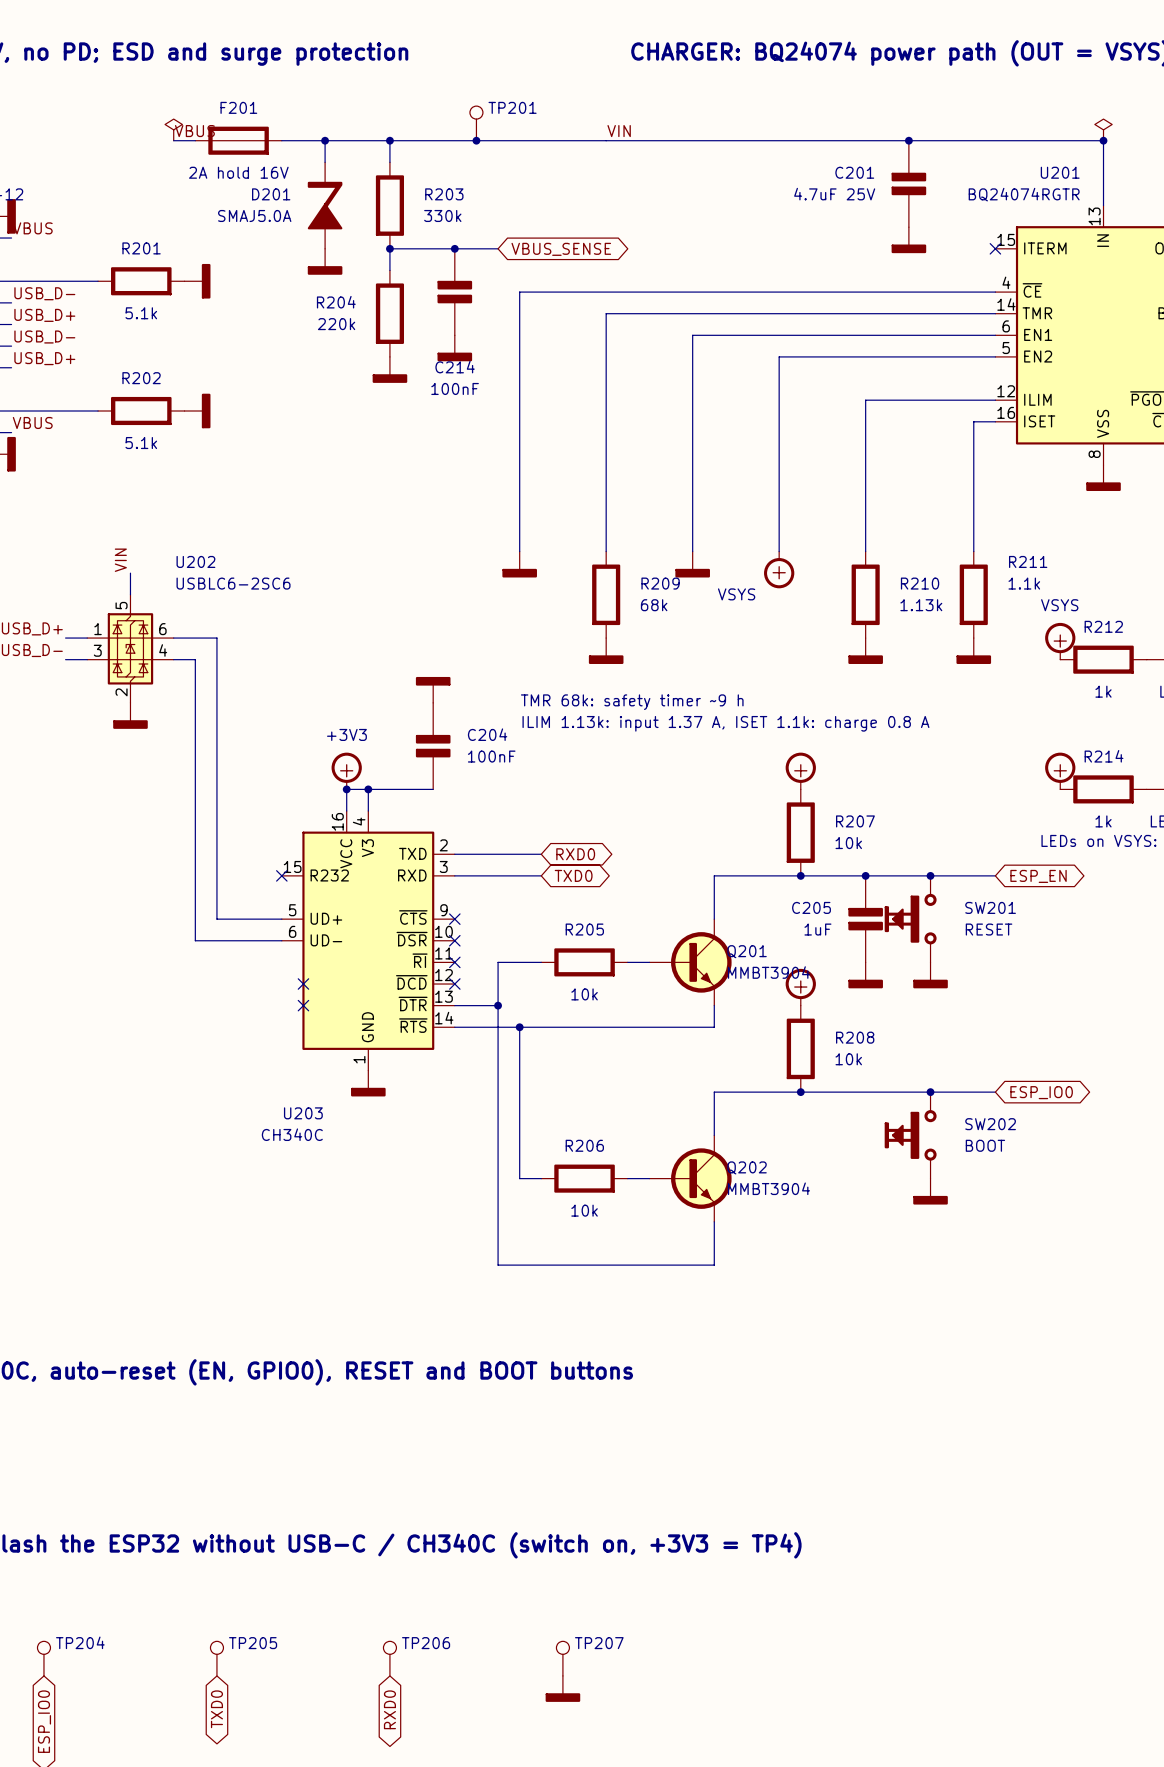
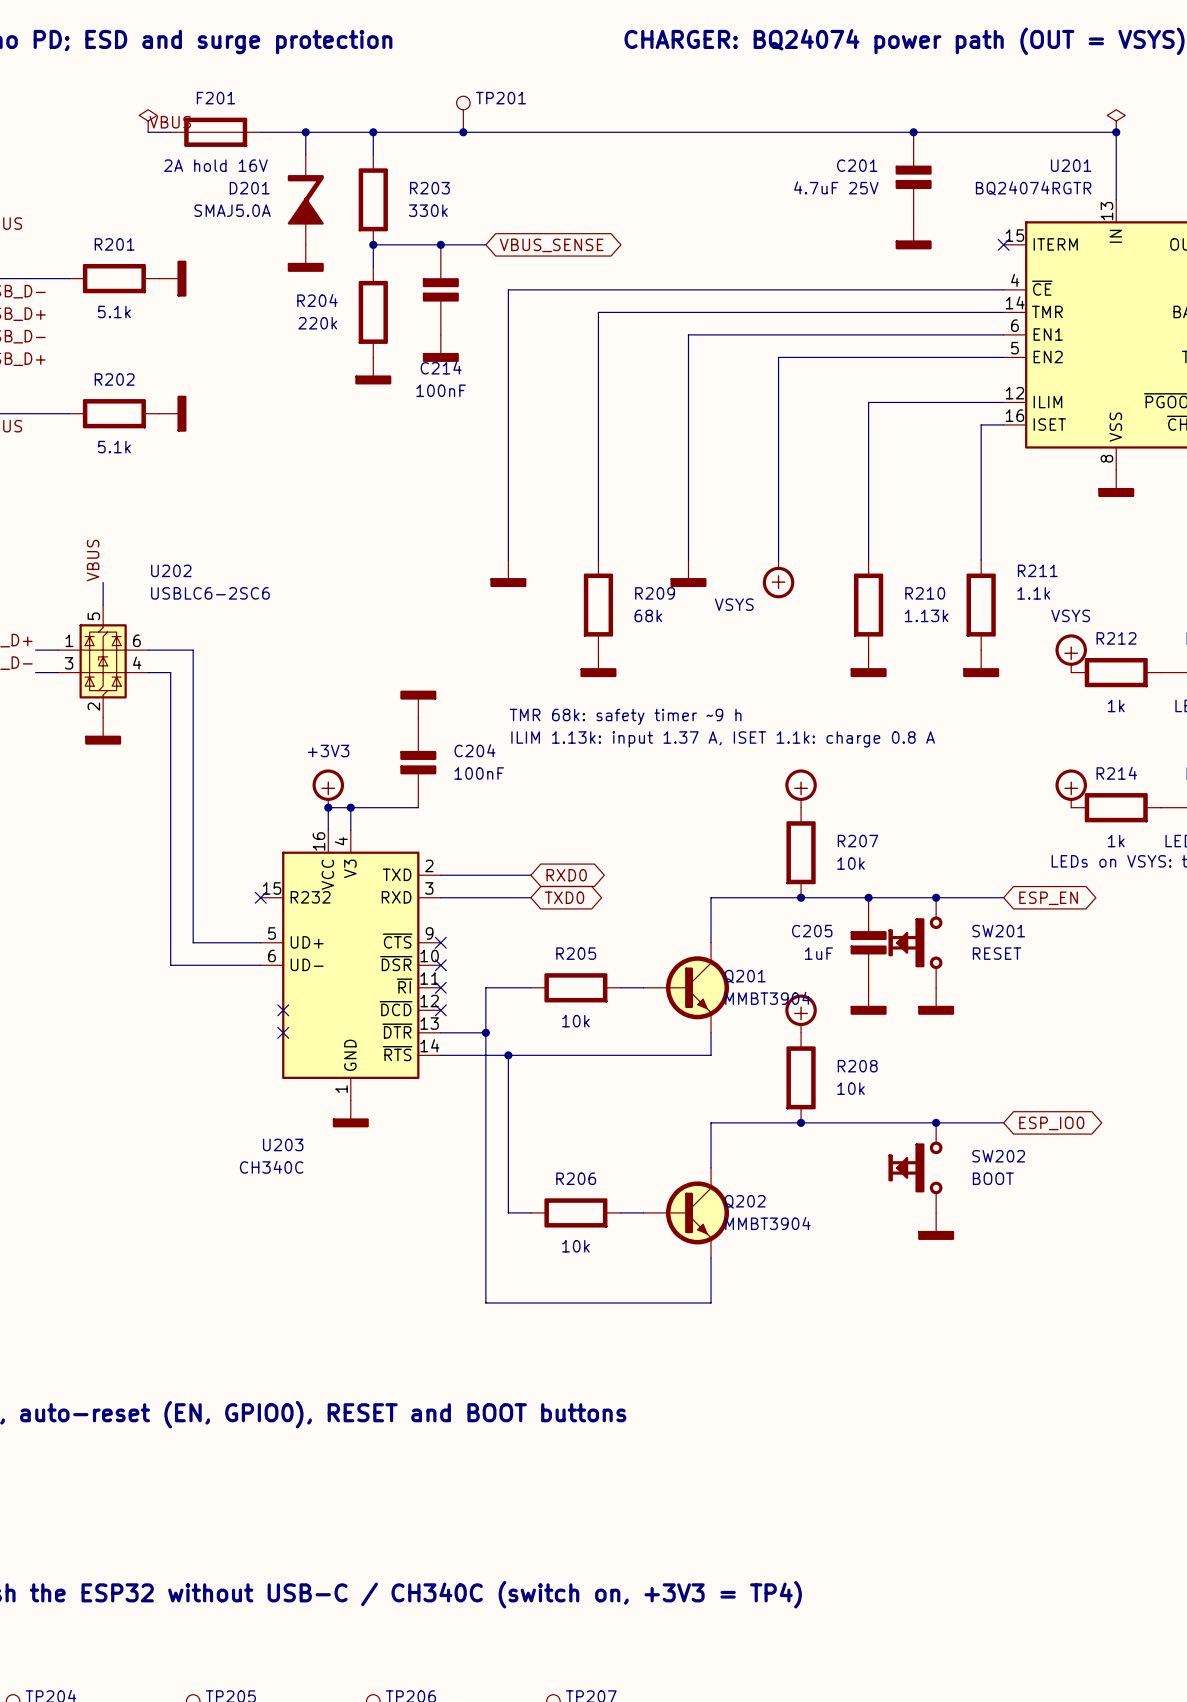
label: VIN (619, 131) -> none
label: VIN (120, 560) -> VBUS (93, 560)

